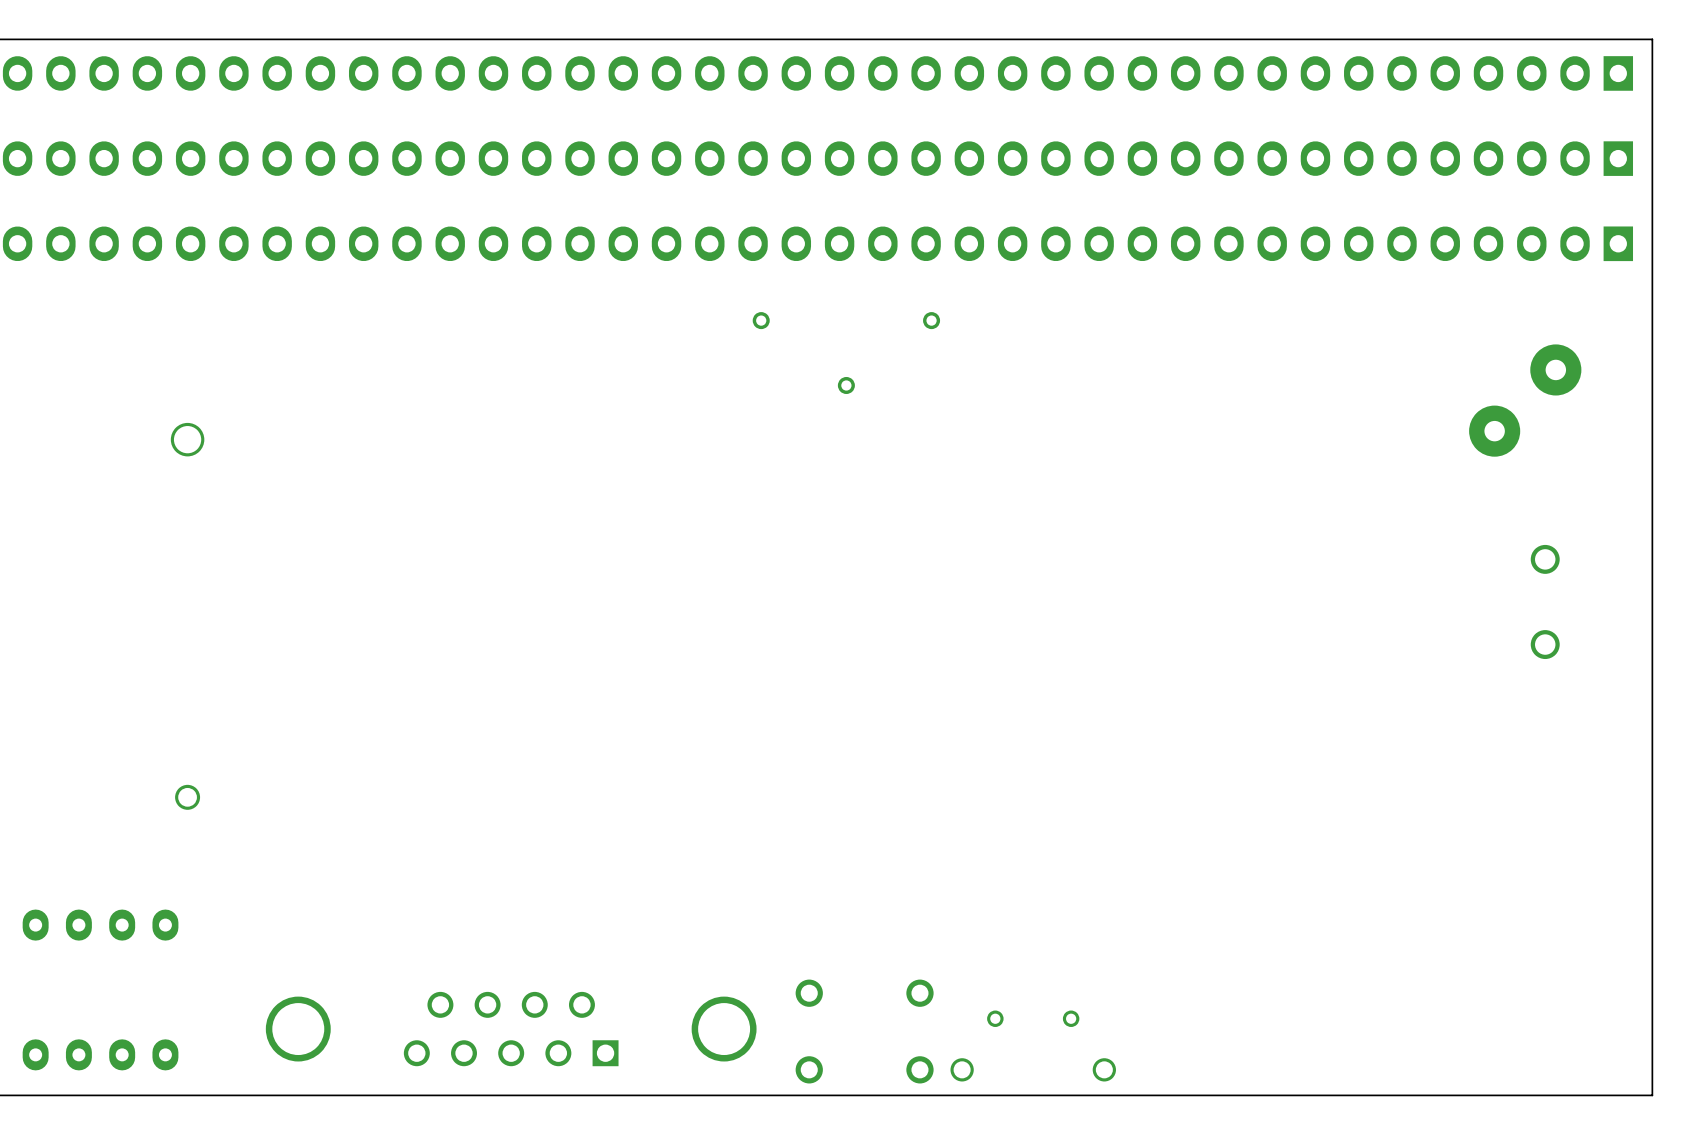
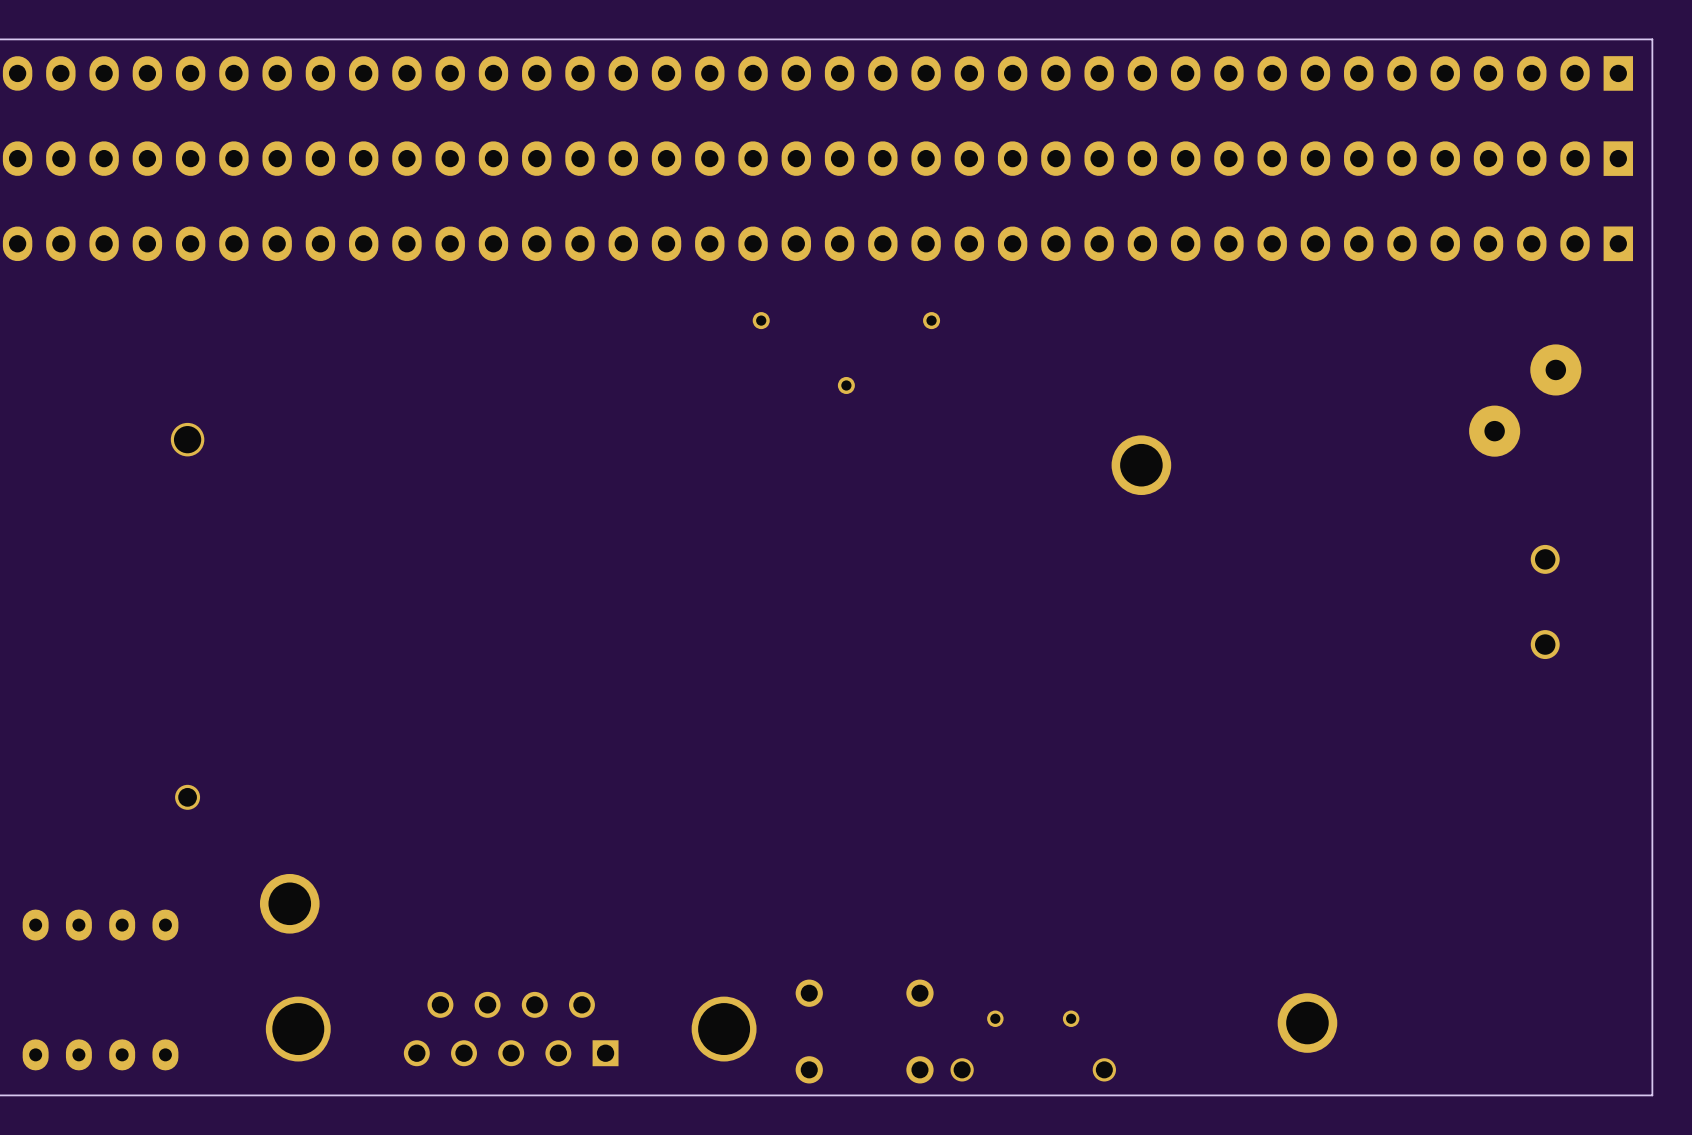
part: none -> (1141, 465)
part: none -> (289, 903)
part: none -> (1307, 1023)

